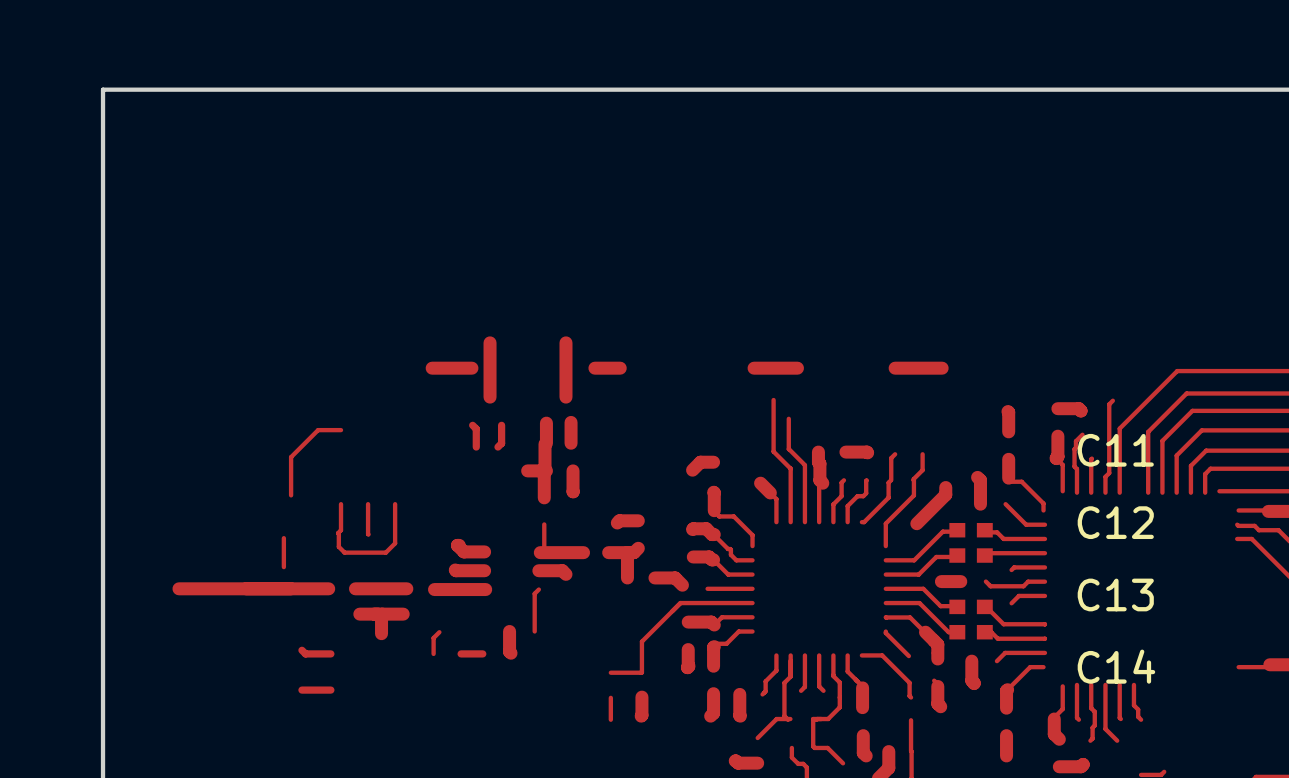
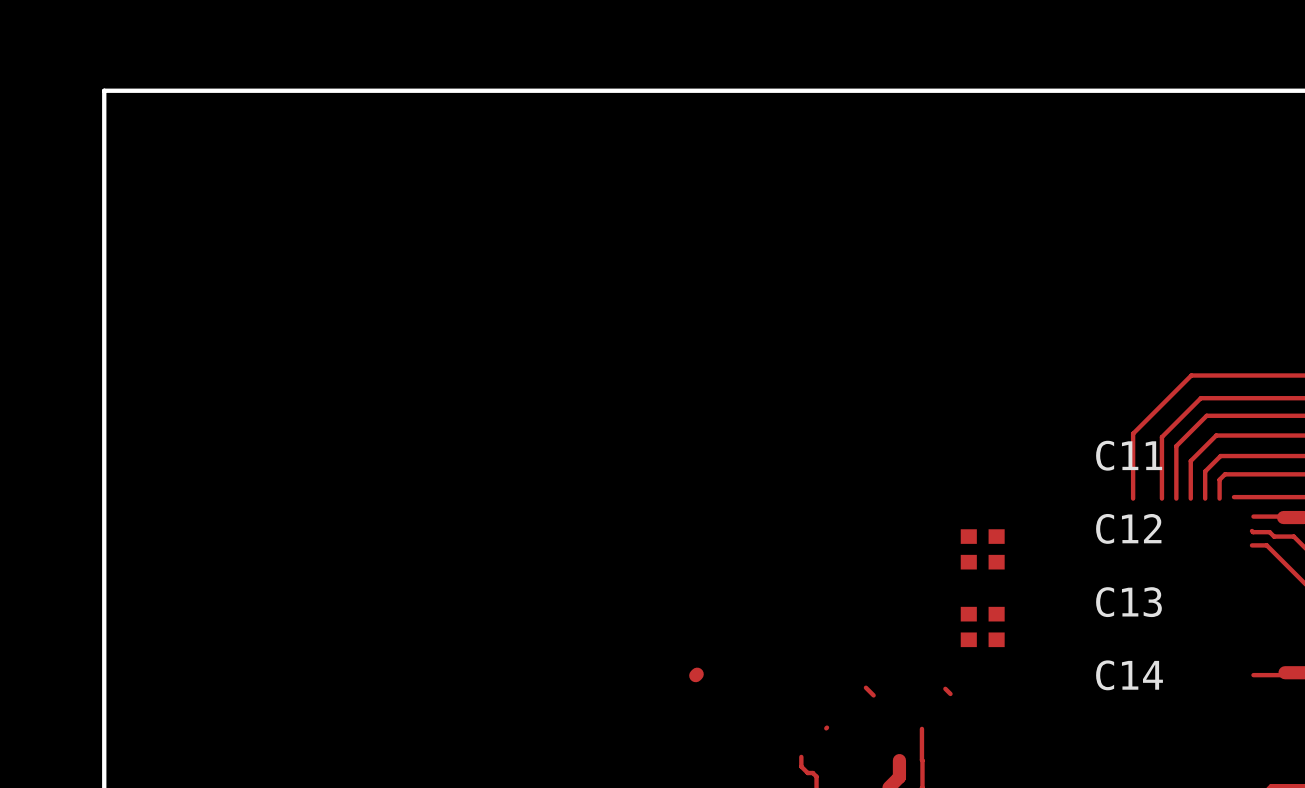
track: (490, 342) (490, 397) -> none
track: (565, 342) (565, 397) -> none
track: (432, 368) (471, 368) -> none
track: (594, 368) (620, 368) -> none
track: (754, 368) (797, 368) -> none
track: (895, 368) (942, 368) -> none
track: (773, 400) (773, 451) (790, 468) -> none
track: (1112, 400) (1109, 404) (1109, 473) (1105, 476) (1105, 492) -> none
track: (1057, 408) (1078, 408) (1081, 410) -> none
track: (1007, 411) (1008, 431) -> none
track: (788, 418) (788, 449) -> none
track: (571, 422) (571, 443) -> none
track: (546, 423) (546, 443) -> none
track: (472, 425) (476, 428) (476, 447) -> none
track: (501, 425) (501, 443) (497, 447) -> none
track: (341, 430) (318, 430) (291, 457) (291, 495) -> none
track: (1082, 434) (1075, 441) (1074, 449) (1076, 492) -> none
track: (1057, 436) (1057, 456) (1056, 458) -> none
track: (545, 444) (545, 468) -> none
track: (789, 449) (804, 465) -> none
track: (818, 452) (819, 480) (822, 483) -> none
track: (845, 452) (867, 452) -> none
track: (895, 454) (891, 458) (891, 480) -> none
track: (922, 454) (922, 470) (913, 479) (913, 495) (885, 523) (885, 546) -> none
track: (1057, 457) (1056, 458) (1062, 464) (1062, 491) -> none
track: (1091, 458) (1091, 492) -> none
track: (1008, 459) (1008, 478) -> none
track: (713, 462) (700, 462) (692, 470) -> none
track: (804, 465) (804, 522) -> none
track: (790, 468) (790, 522) -> none
track: (527, 470) (546, 470) -> none
track: (573, 470) (573, 491) -> none
track: (544, 476) (544, 497) -> none
track: (977, 477) (980, 480) (980, 504) -> none
track: (843, 480) (841, 482) (841, 496) (833, 504) (833, 522) -> none
track: (866, 480) (866, 493) (863, 496) (857, 496) (847, 506) (847, 522) -> none
track: (890, 480) (888, 482) (888, 497) (861, 522) -> none
track: (1008, 480) (1021, 481) (1043, 503) (1043, 510) -> none
track: (822, 483) (819, 486) (819, 522) -> none
track: (945, 487) (945, 494) (916, 523) -> none
track: (713, 492) (714, 510) -> none
track: (770, 492) (760, 483) (776, 499) (776, 522) -> none
track: (341, 504) (338, 546) (344, 552) (385, 552) (395, 543) (395, 504) -> none
track: (368, 504) (368, 534) -> none
track: (1005, 504) (1026, 524) (1044, 524) -> none
track: (714, 511) (719, 516) (733, 516) (752, 535) (752, 546) -> none
track: (638, 520) (619, 520) (617, 522) -> none
track: (544, 524) (544, 548) (540, 551) -> none
track: (692, 529) (706, 528) (714, 534) -> none
track: (959, 530) (942, 531) (914, 560) (885, 560) -> none
track: (982, 530) (997, 532) (1003, 538) (1044, 538) -> none
track: (713, 534) (730, 549) (730, 554) (736, 560) (752, 560) -> none
track: (283, 538) (283, 567) -> none
track: (459, 545) (457, 545) (463, 551) (484, 551) -> none
track: (638, 548) (633, 552) (608, 552) -> none
track: (540, 552) (583, 552) -> none
track: (627, 552) (627, 577) -> none
track: (1044, 553) (985, 553) (982, 556) -> none
track: (693, 556) (709, 556) (713, 559) -> none
track: (959, 556) (936, 556) (918, 574) (885, 574) -> none
track: (715, 561) (728, 574) (752, 574) -> none
track: (1044, 567) (1014, 567) (1011, 570) -> none
track: (455, 570) (484, 570) -> none
track: (538, 570) (562, 570) (565, 574) -> none
track: (654, 577) (675, 577) (682, 585) -> none
track: (941, 581) (960, 581) -> none
track: (985, 581) (989, 585) -> none
track: (1044, 581) (1028, 581) (1023, 586) (989, 585) -> none
track: (178, 588) (328, 588) -> none
track: (355, 588) (406, 588) -> none
track: (707, 588) (752, 588) -> none
track: (885, 588) (923, 588) (940, 606) (959, 606) -> none
track: (434, 589) (485, 589) -> none
track: (538, 589) (534, 593) (534, 631) -> none
track: (1044, 595) (1018, 595) (1011, 603) -> none
track: (752, 603) (680, 603) (641, 641) (641, 672) -> none
track: (885, 603) (919, 603) (948, 632) (959, 632) -> none
track: (982, 606) (986, 606) (1003, 624) (1044, 624) -> none
track: (359, 614) (403, 614) -> none
track: (382, 614) (381, 633) -> none
track: (752, 617) (721, 617) (714, 624) (711, 622) (688, 622) -> none
track: (886, 617) (910, 617) (925, 632) -> none
track: (509, 631) (511, 653) -> none
track: (752, 631) (738, 631) (726, 643) (717, 643) (714, 646) -> none
track: (885, 631) (908, 656) -> none
track: (439, 632) (433, 638) (433, 653) -> none
track: (925, 632) (937, 644) (937, 658) -> none
track: (982, 632) (991, 632) (997, 638) (1044, 638) -> none
track: (714, 646) (713, 666) -> none
track: (688, 649) (688, 666) -> none
track: (301, 650) (305, 653) (330, 653) -> none
track: (1044, 652) (1005, 652) (996, 661) -> none
track: (461, 653) (482, 653) -> none
track: (776, 655) (776, 670) (765, 681) (765, 691) (762, 694) -> none
track: (790, 655) (790, 676) (784, 682) (784, 716) (788, 719) -> none
track: (804, 655) (804, 686) (801, 690) -> none
track: (819, 655) (819, 686) (823, 690) -> none
track: (833, 655) (833, 676) (839, 682) (839, 707) (828, 719) (813, 719) (813, 746) (827, 747) (843, 763) -> none
track: (847, 655) (847, 671) (857, 681) -> none
track: (861, 655) (882, 655) (909, 682) (911, 697) -> none
track: (971, 661) (971, 680) (974, 683) -> none
track: (1043, 667) (1030, 667) (1007, 689) -> none
track: (610, 672) (641, 672) -> none
track: (1076, 684) (1076, 717) (1078, 719) -> none
track: (1091, 684) (1091, 708) (1094, 711) (1094, 725) (1090, 740) -> none
track: (1105, 684) (1105, 728) (1117, 740) -> none
track: (1119, 684) (1120, 719) -> none
track: (1133, 684) (1133, 705) (1138, 709) (1138, 716) (1141, 719) -> none
track: (937, 686) (937, 703) (940, 706) -> none
track: (1062, 686) (1062, 709) (1054, 717) -> none
track: (862, 687) (862, 707) -> none
track: (1007, 689) (1006, 708) -> none
track: (301, 690) (330, 690) -> none
track: (713, 693) (713, 713) (710, 716) -> none
track: (739, 694) (740, 716) -> none
track: (610, 697) (610, 719) -> none
track: (641, 697) (641, 716) -> none
track: (790, 719) (776, 719) (757, 738) -> none
track: (1054, 719) (1054, 734) (1059, 739) -> none
track: (863, 735) (863, 753) (866, 755) -> none
track: (1006, 735) (1006, 755) -> none
track: (735, 760) (738, 763) (757, 763) -> none
track: (1083, 764) (1081, 766) (1059, 766) -> none
track: (1164, 771) (1161, 774) (1141, 774) -> none

